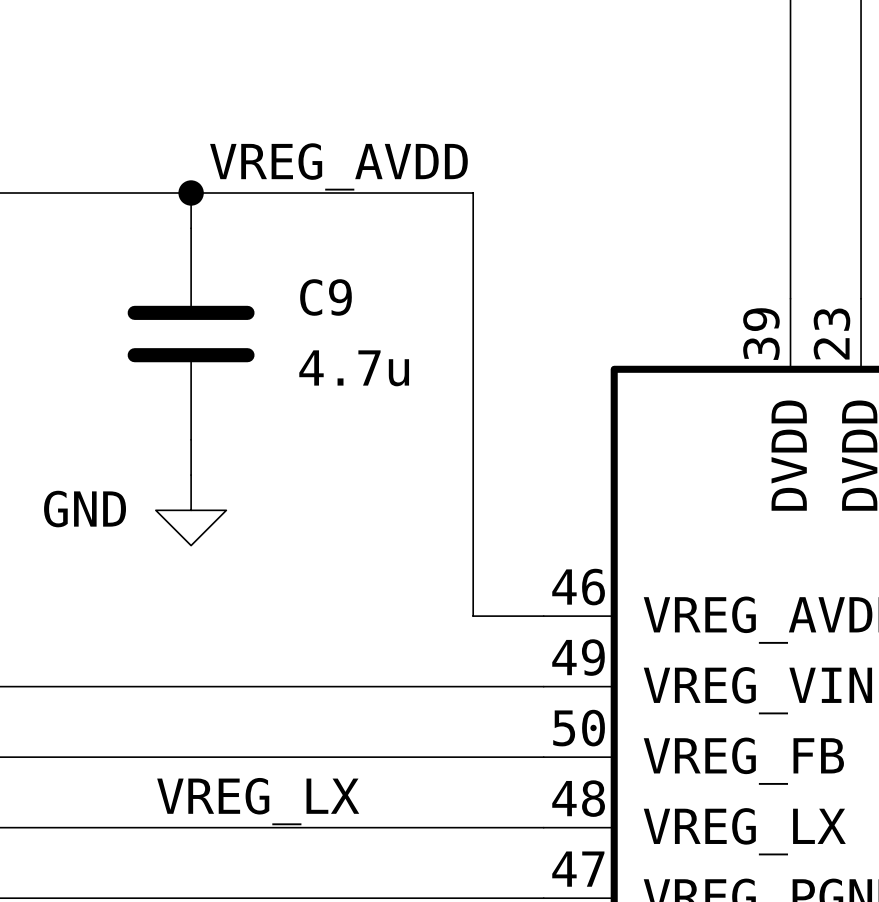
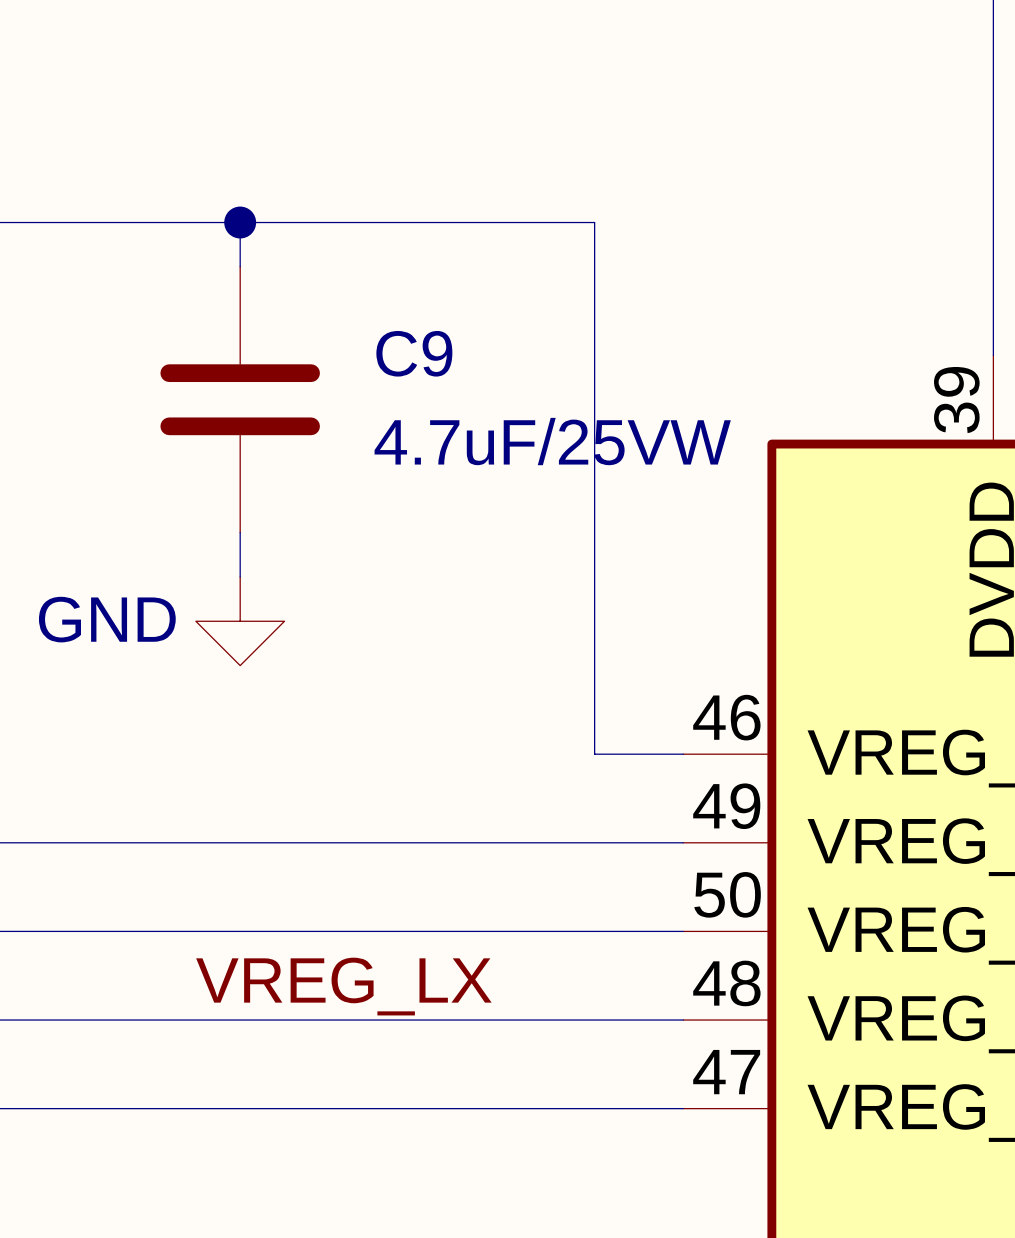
label: VREG_AVDD (338, 166) -> none
C9 value: 4.7u (354, 368) -> 4.7uF/25VW (552, 441)

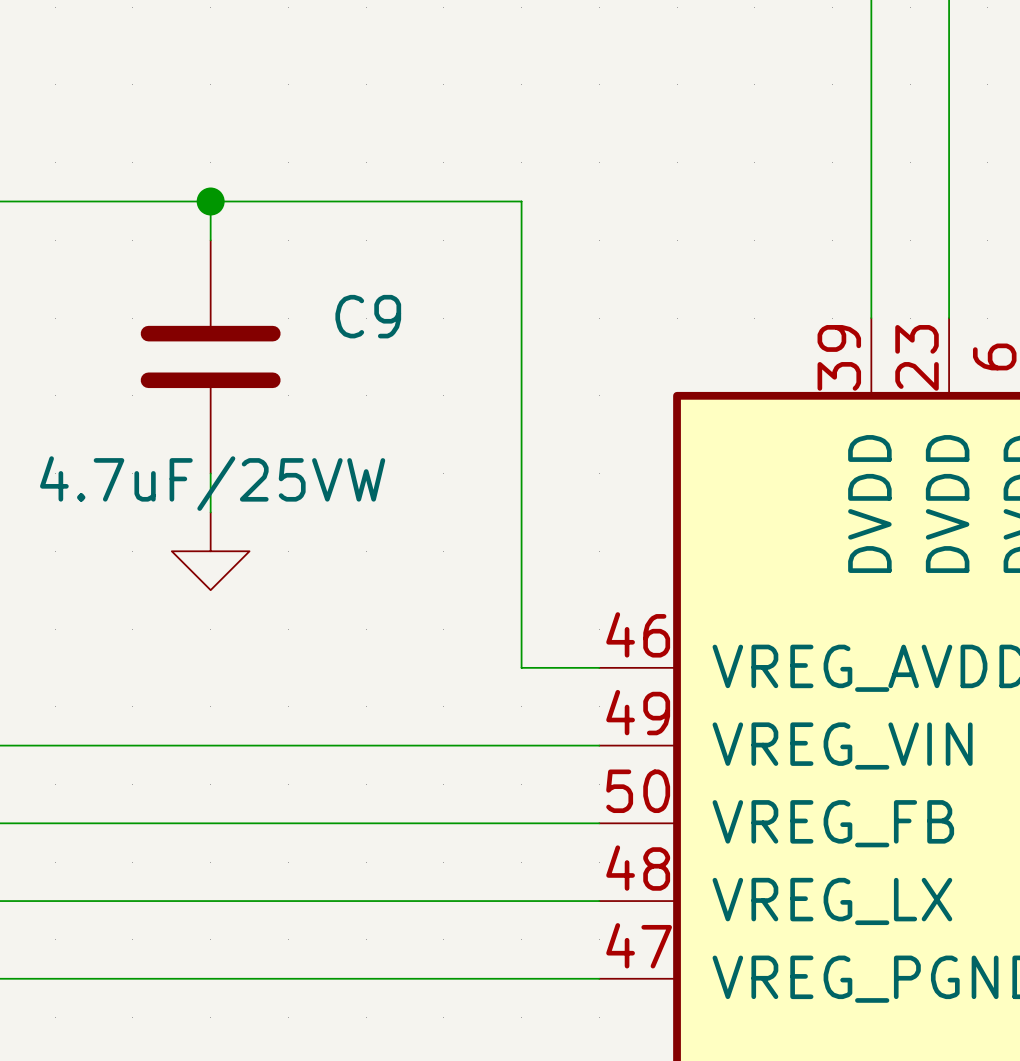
C9 value position: 4.7uF/25VW (552, 441) -> 4.7uF/25VW (212, 483)
power symbol text: GND (107, 619) -> none
label: VREG_LX (343, 986) -> none

